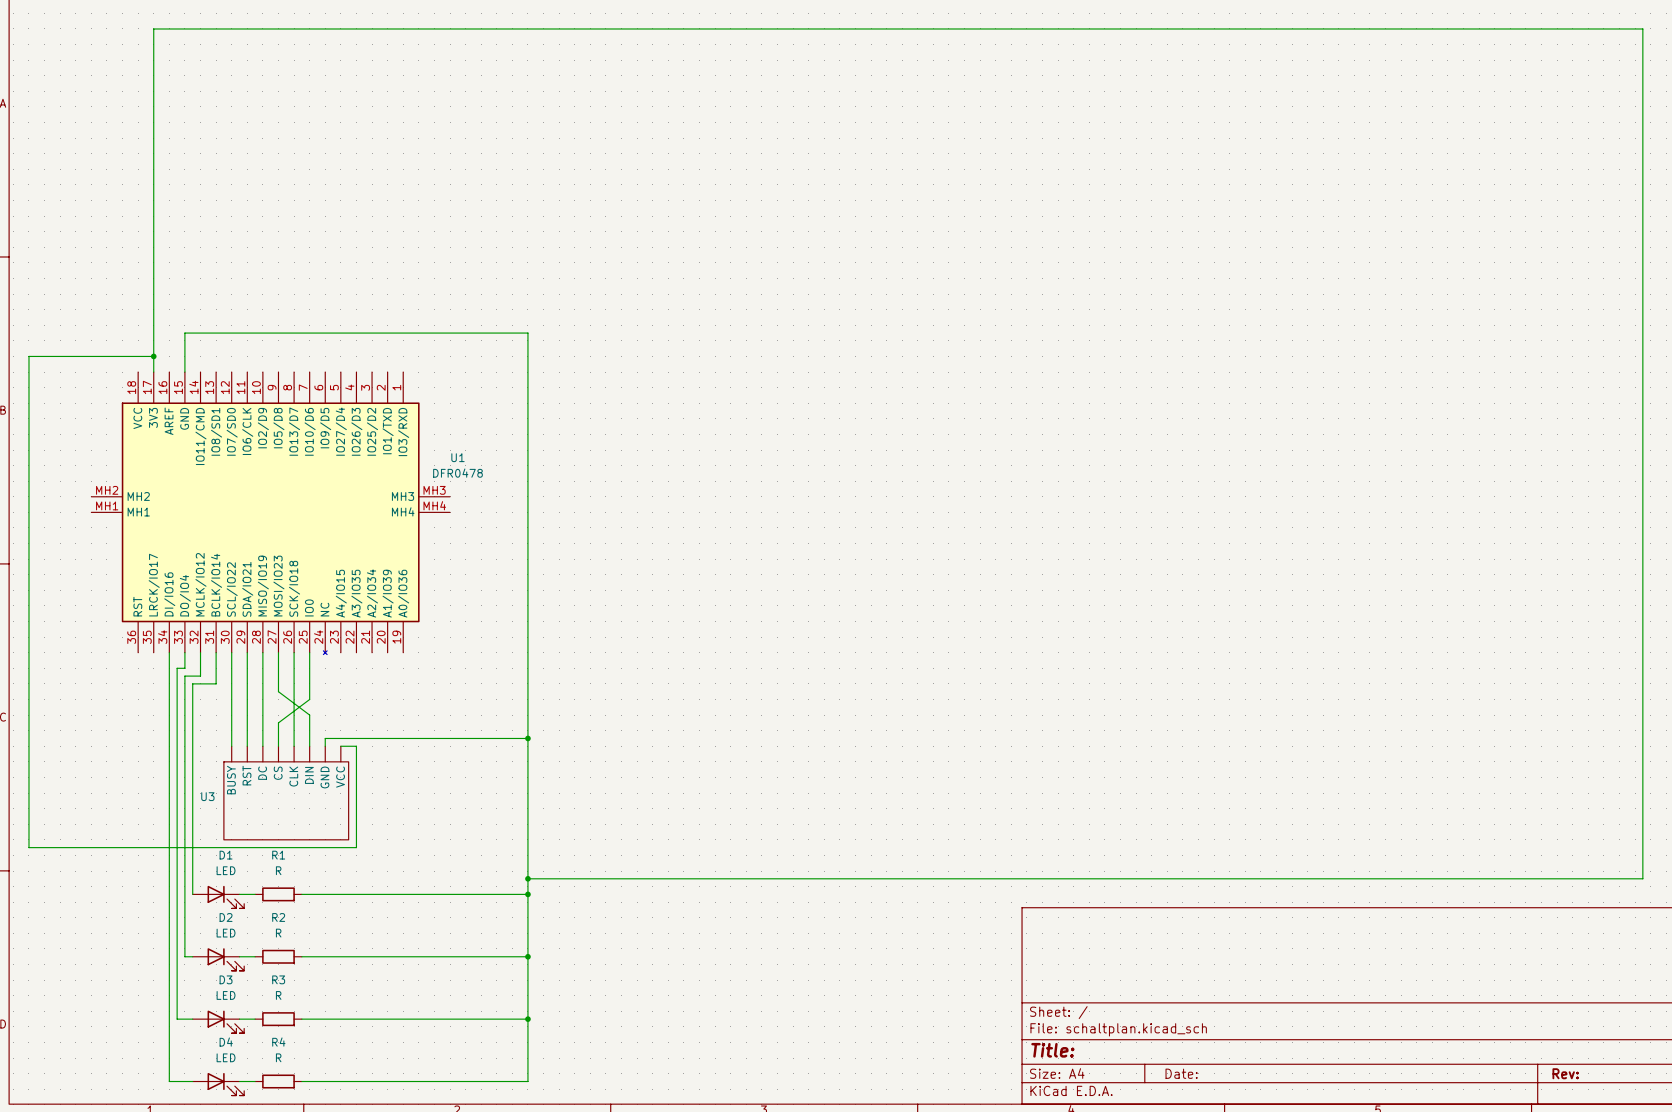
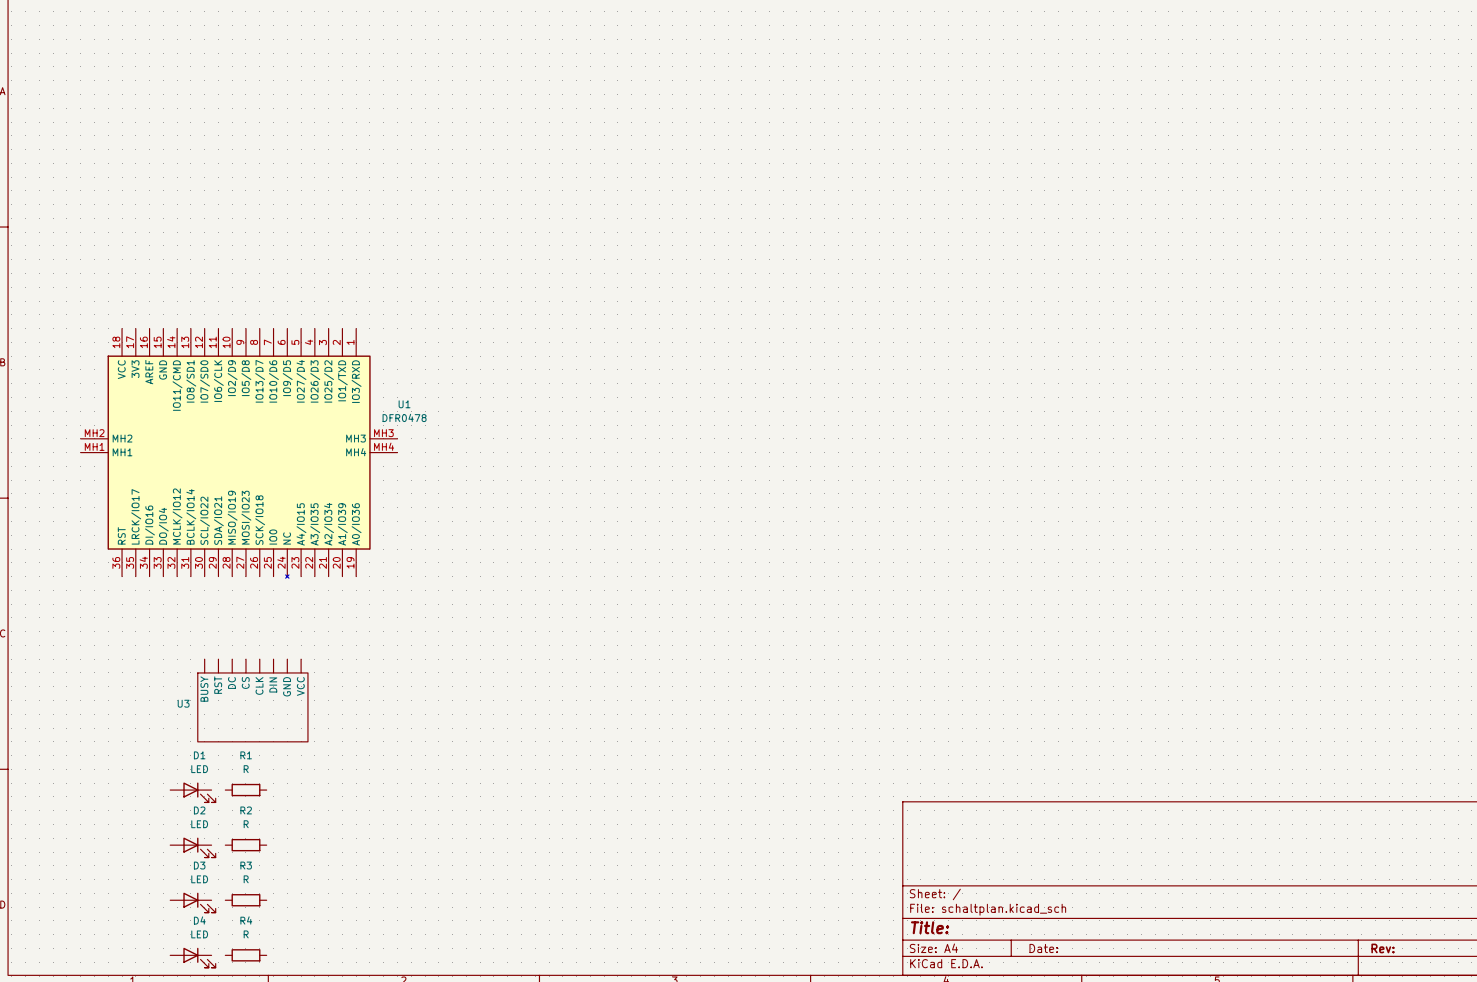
wire: (153, 356) (28, 356) (28, 847) (356, 847) (356, 746) (340, 746) -> none
junction: (153, 356) -> none
wire: (153, 372) (153, 28) (1642, 28) (1642, 878) (527, 878) -> none
wire: (184, 372) (184, 333) (527, 333) (527, 1081) (301, 1081) -> none
wire: (169, 652) (169, 1081) (192, 1081) -> none
wire: (184, 652) (184, 668) (177, 668) (177, 1019) (192, 1019) -> none
wire: (200, 652) (200, 676) (184, 676) (184, 956) (192, 956) -> none
wire: (216, 652) (216, 683) (192, 683) (192, 894) -> none
wire: (231, 652) (231, 746) -> none
wire: (247, 652) (247, 746) -> none
wire: (262, 652) (262, 746) -> none
wire: (278, 652) (278, 691) (309, 715) (309, 746) -> none
wire: (294, 652) (294, 746) -> none
wire: (309, 652) (309, 699) (278, 722) (278, 746) -> none
wire: (527, 738) (325, 738) (325, 746) -> none
junction: (527, 738) -> none
junction: (527, 878) -> none
wire: (239, 894) (255, 894) -> none
wire: (301, 894) (527, 894) -> none
junction: (527, 894) -> none
wire: (239, 956) (255, 956) -> none
wire: (301, 956) (527, 956) -> none
junction: (527, 956) -> none
wire: (239, 1019) (255, 1019) -> none
wire: (301, 1019) (527, 1019) -> none
junction: (527, 1019) -> none
wire: (239, 1081) (255, 1081) -> none

